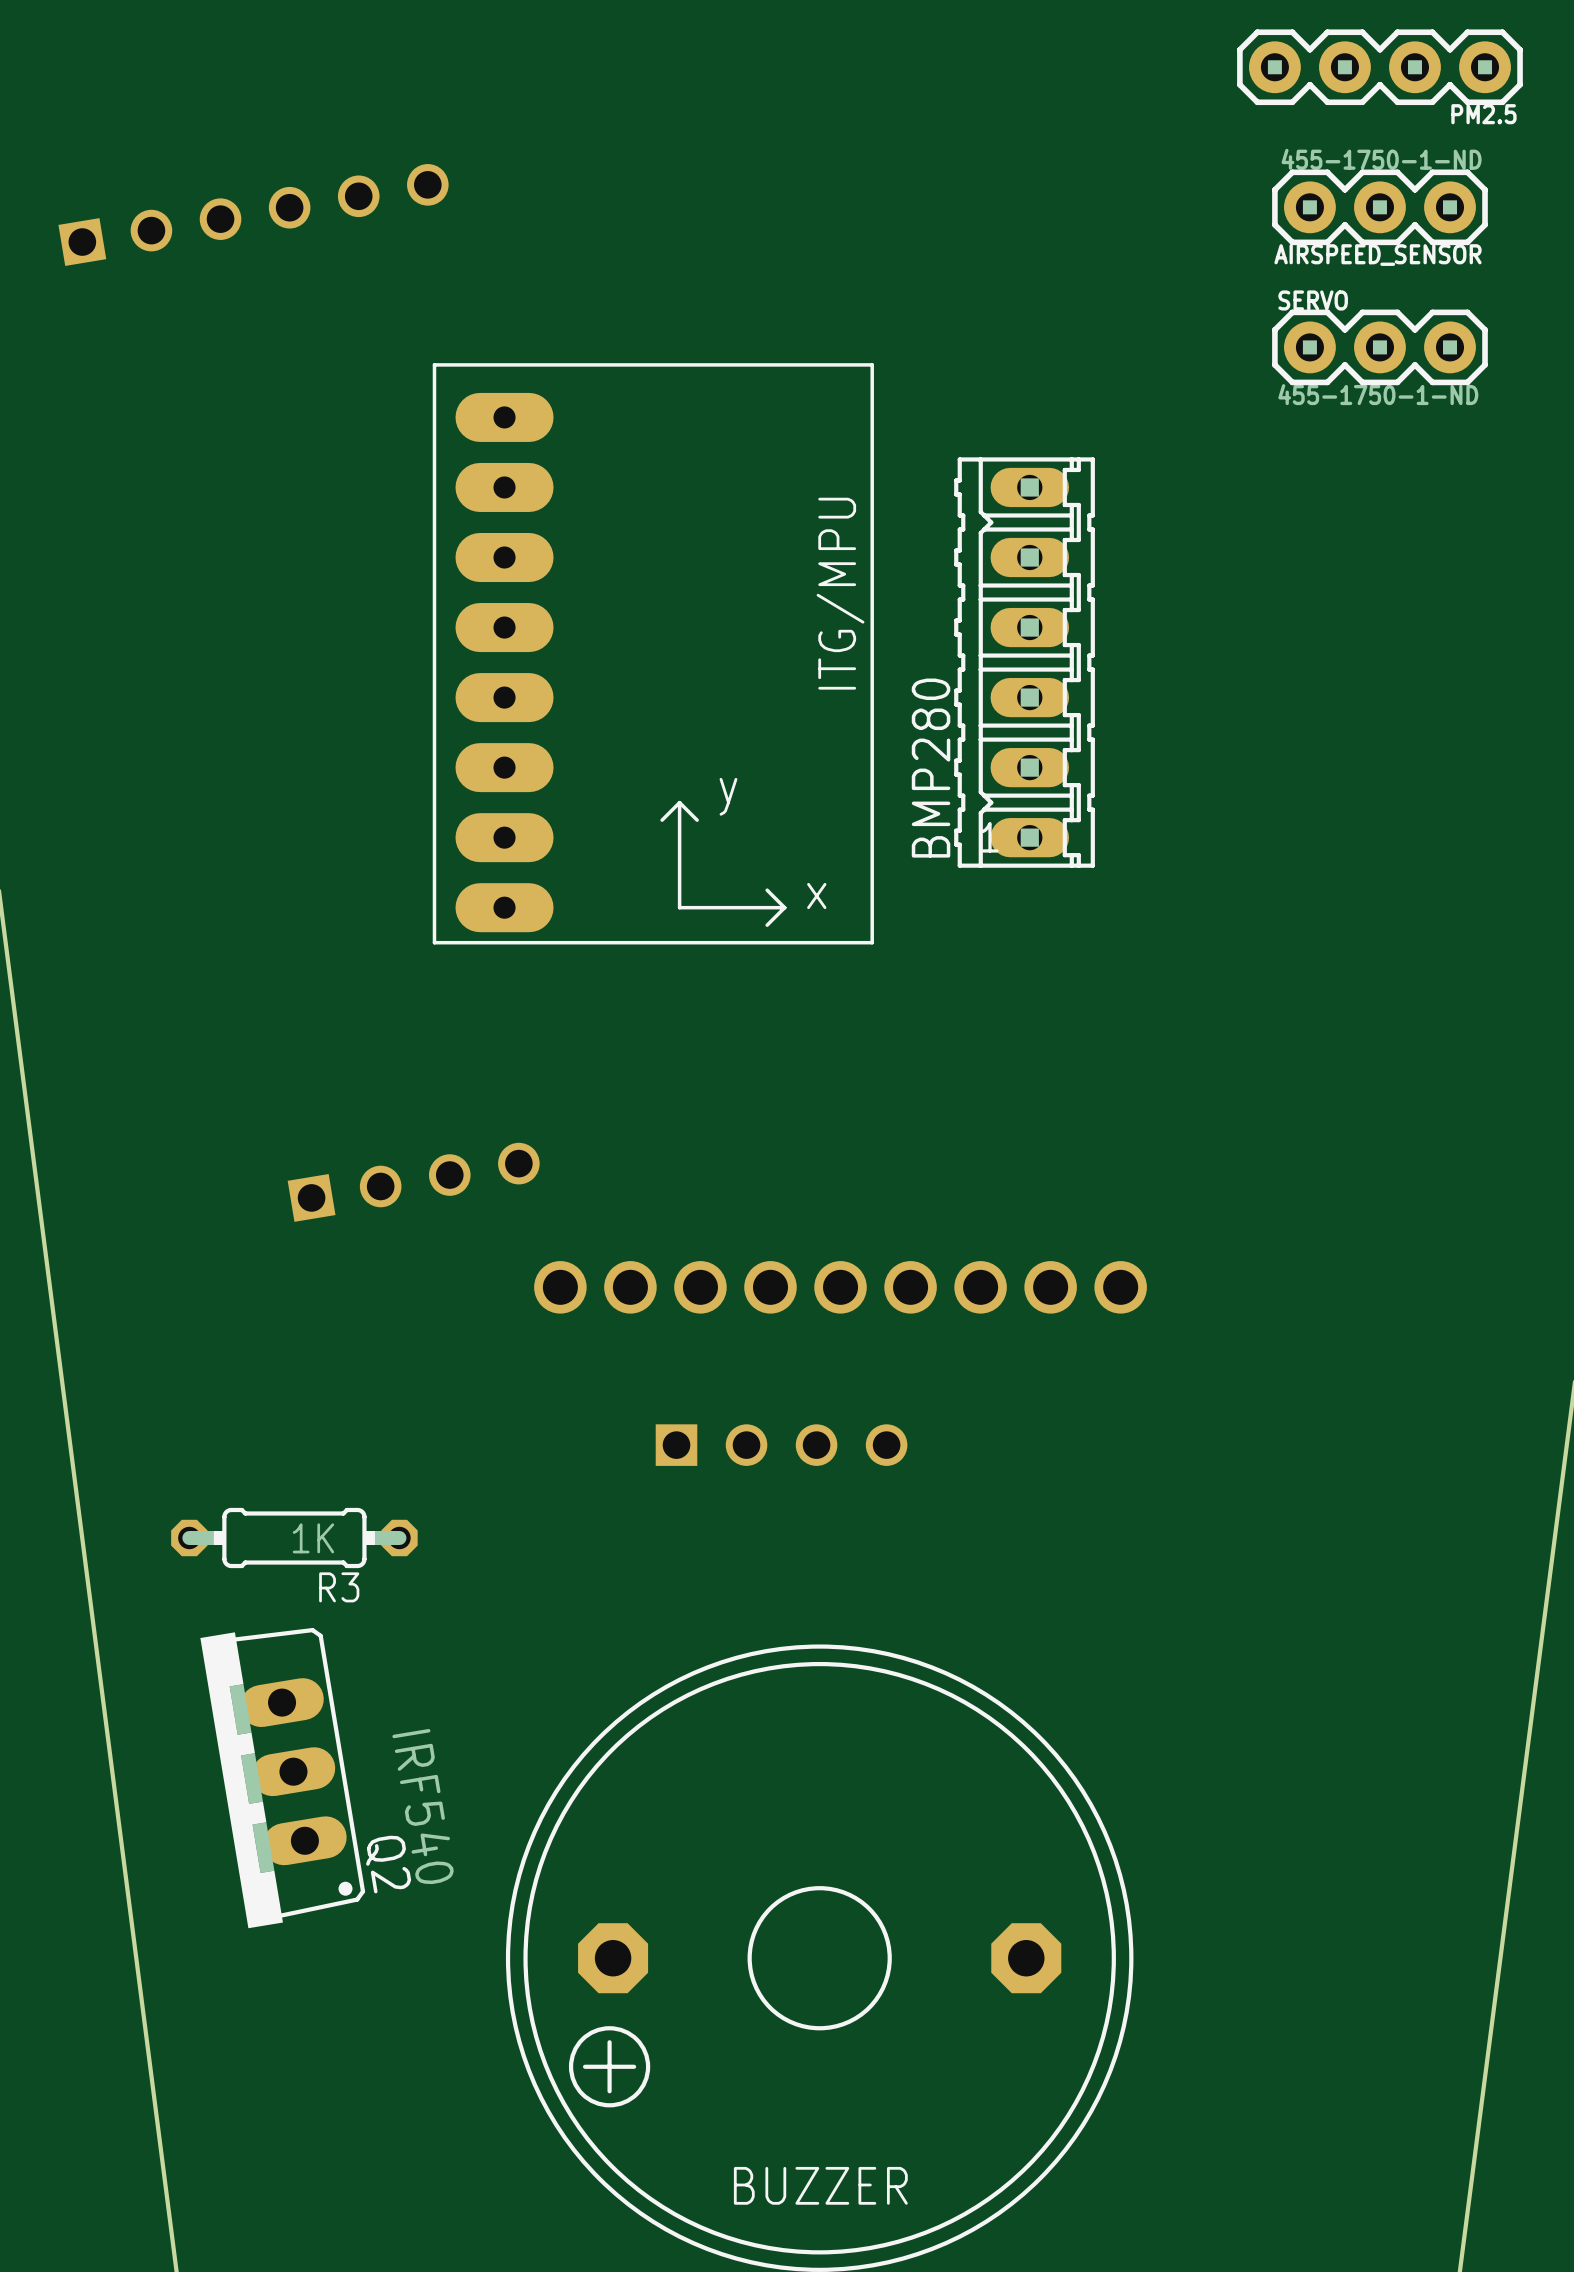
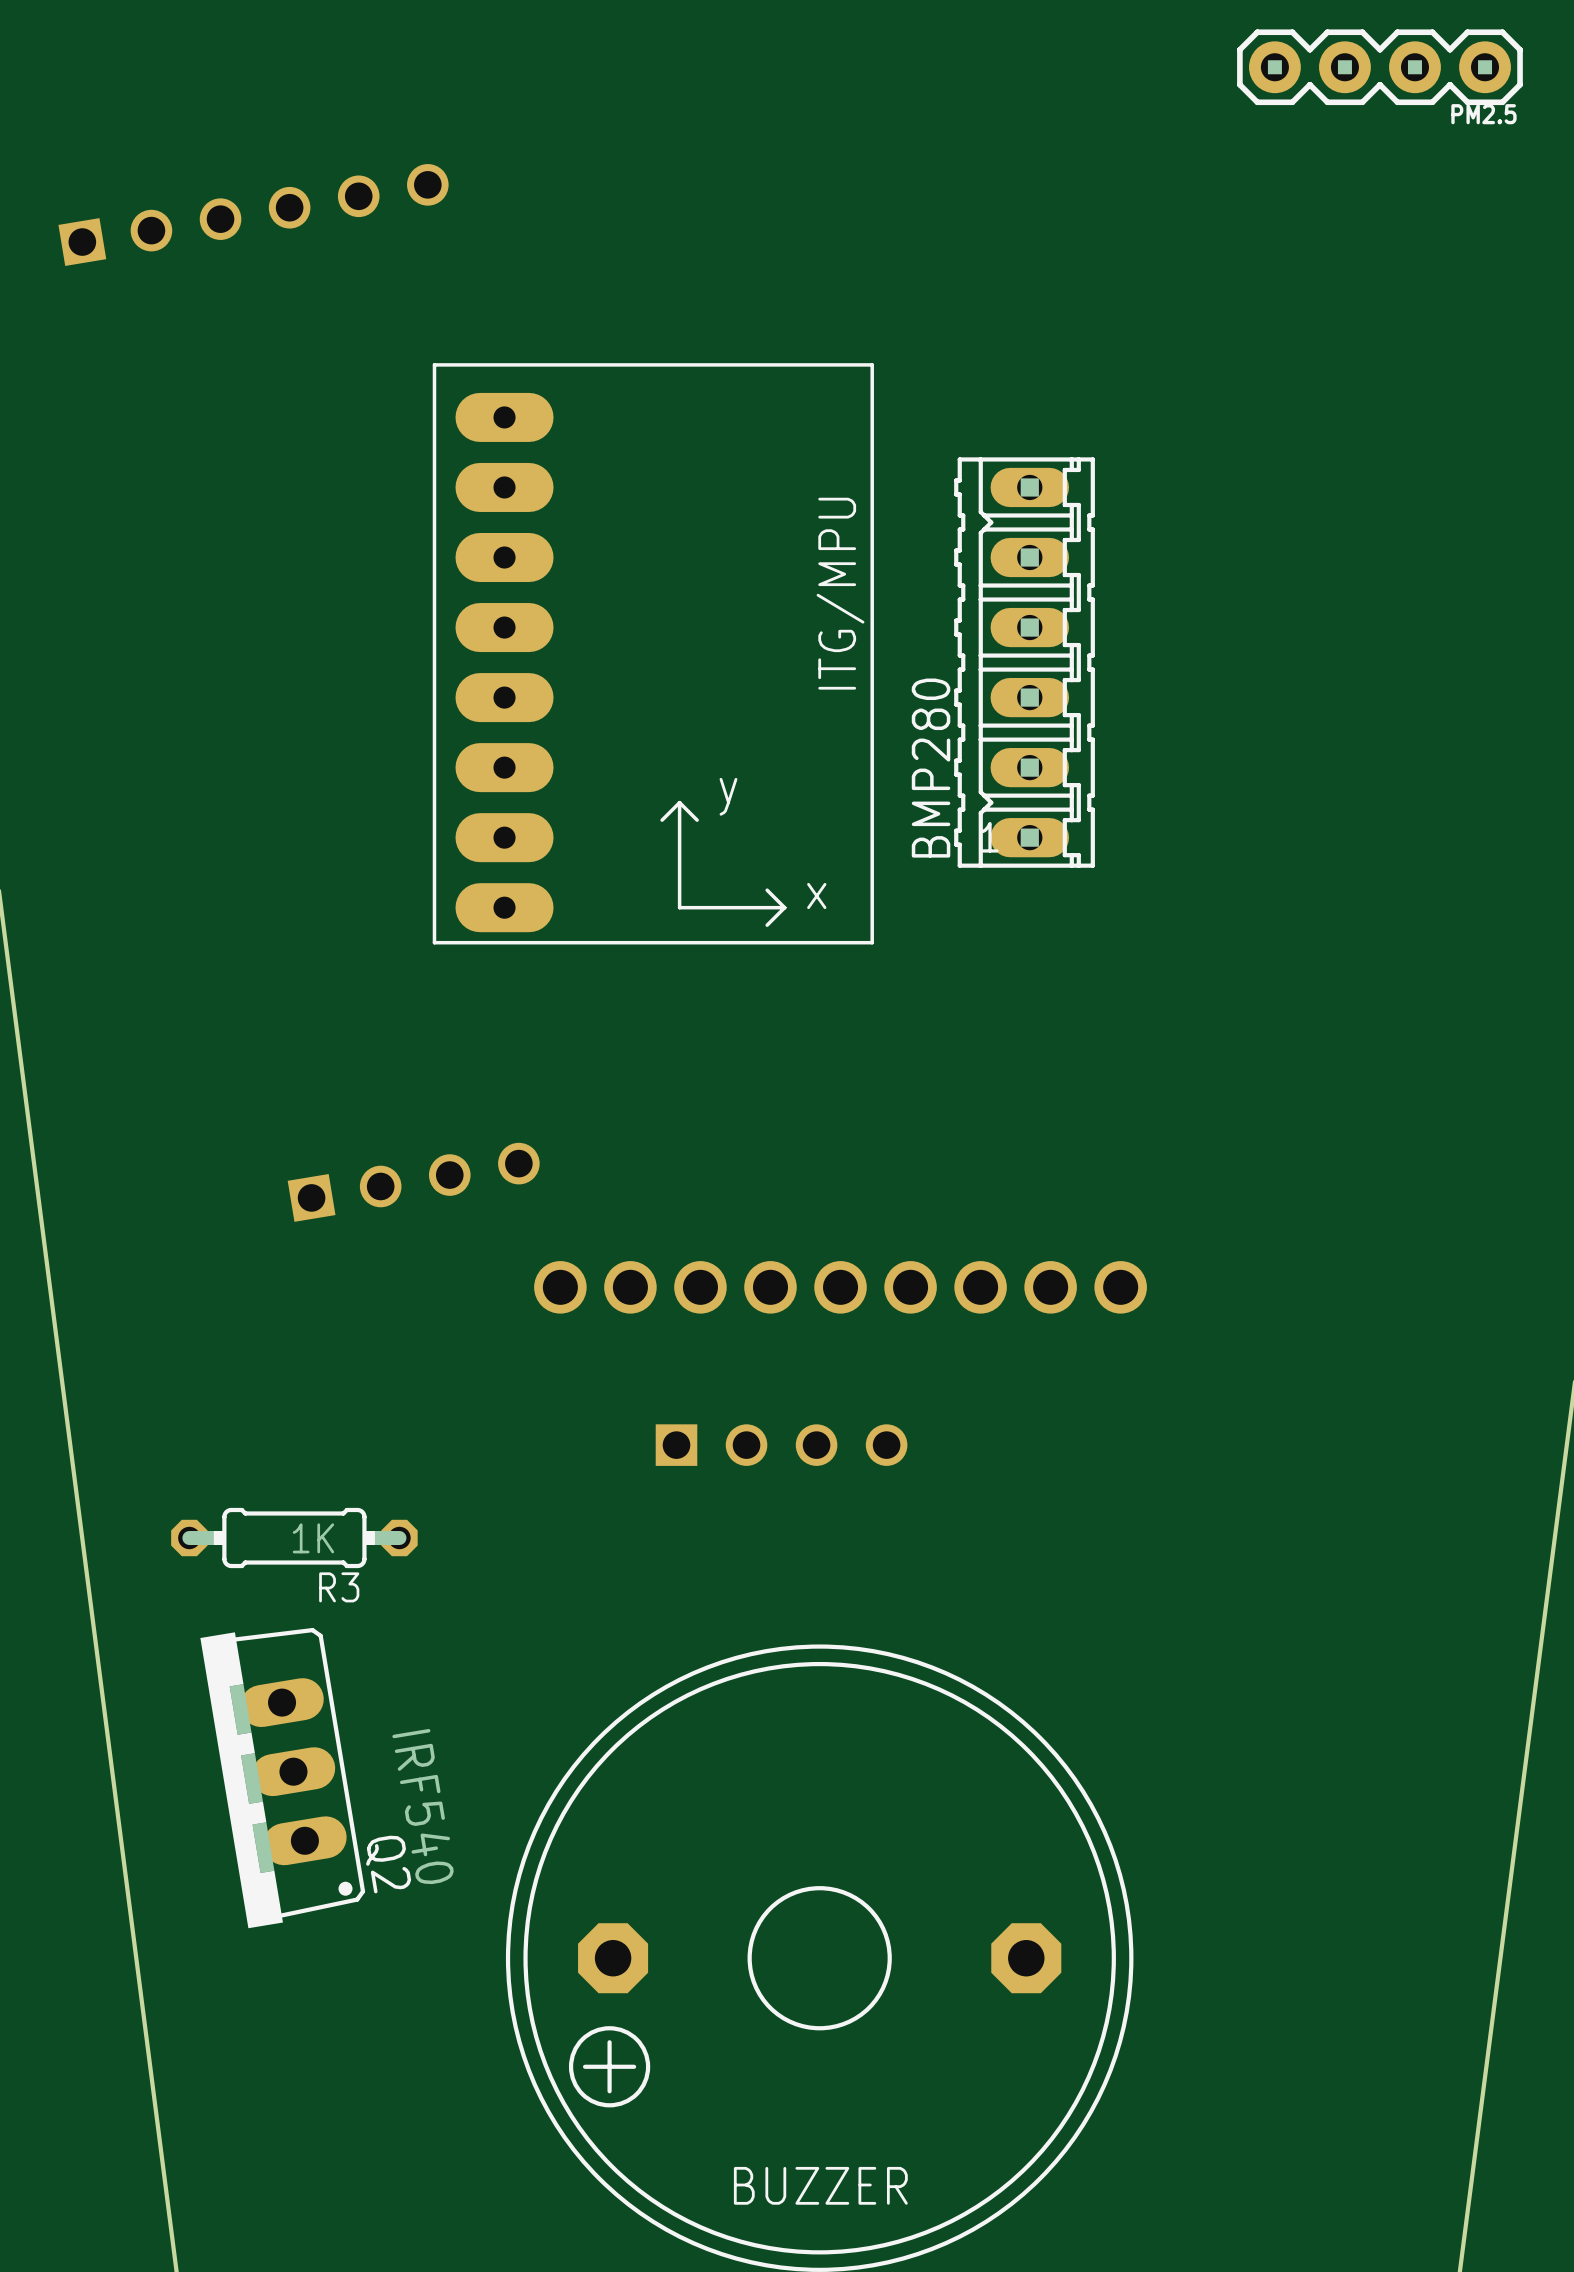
AIRSPEED_SENSOR: 455-1750-1-ND (1379, 207) -> none
SERVO: 455-1750-1-ND (1379, 347) -> none

